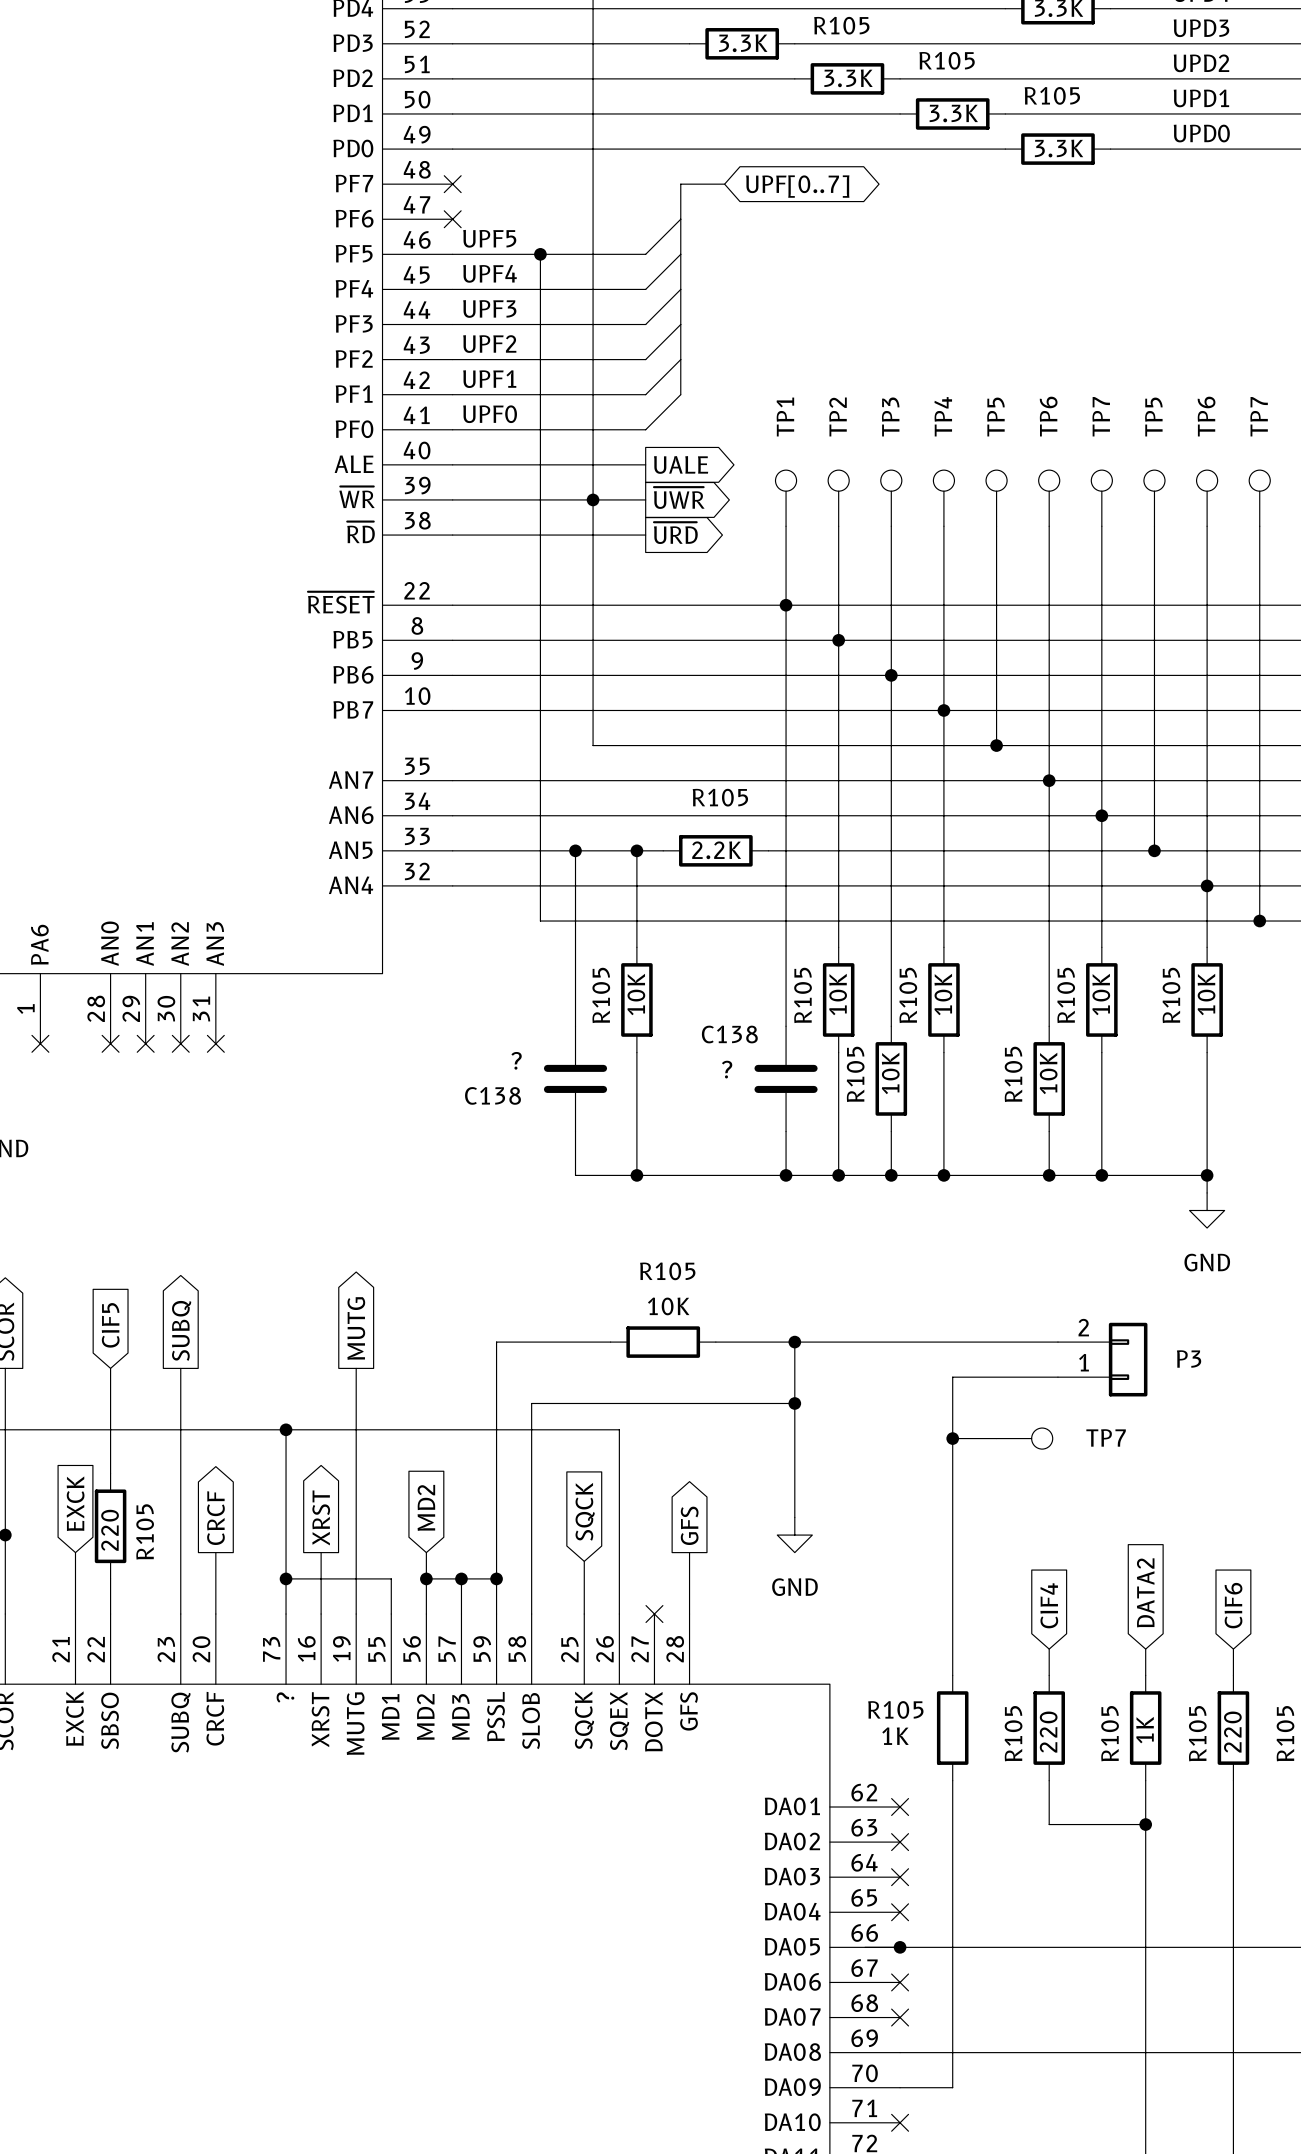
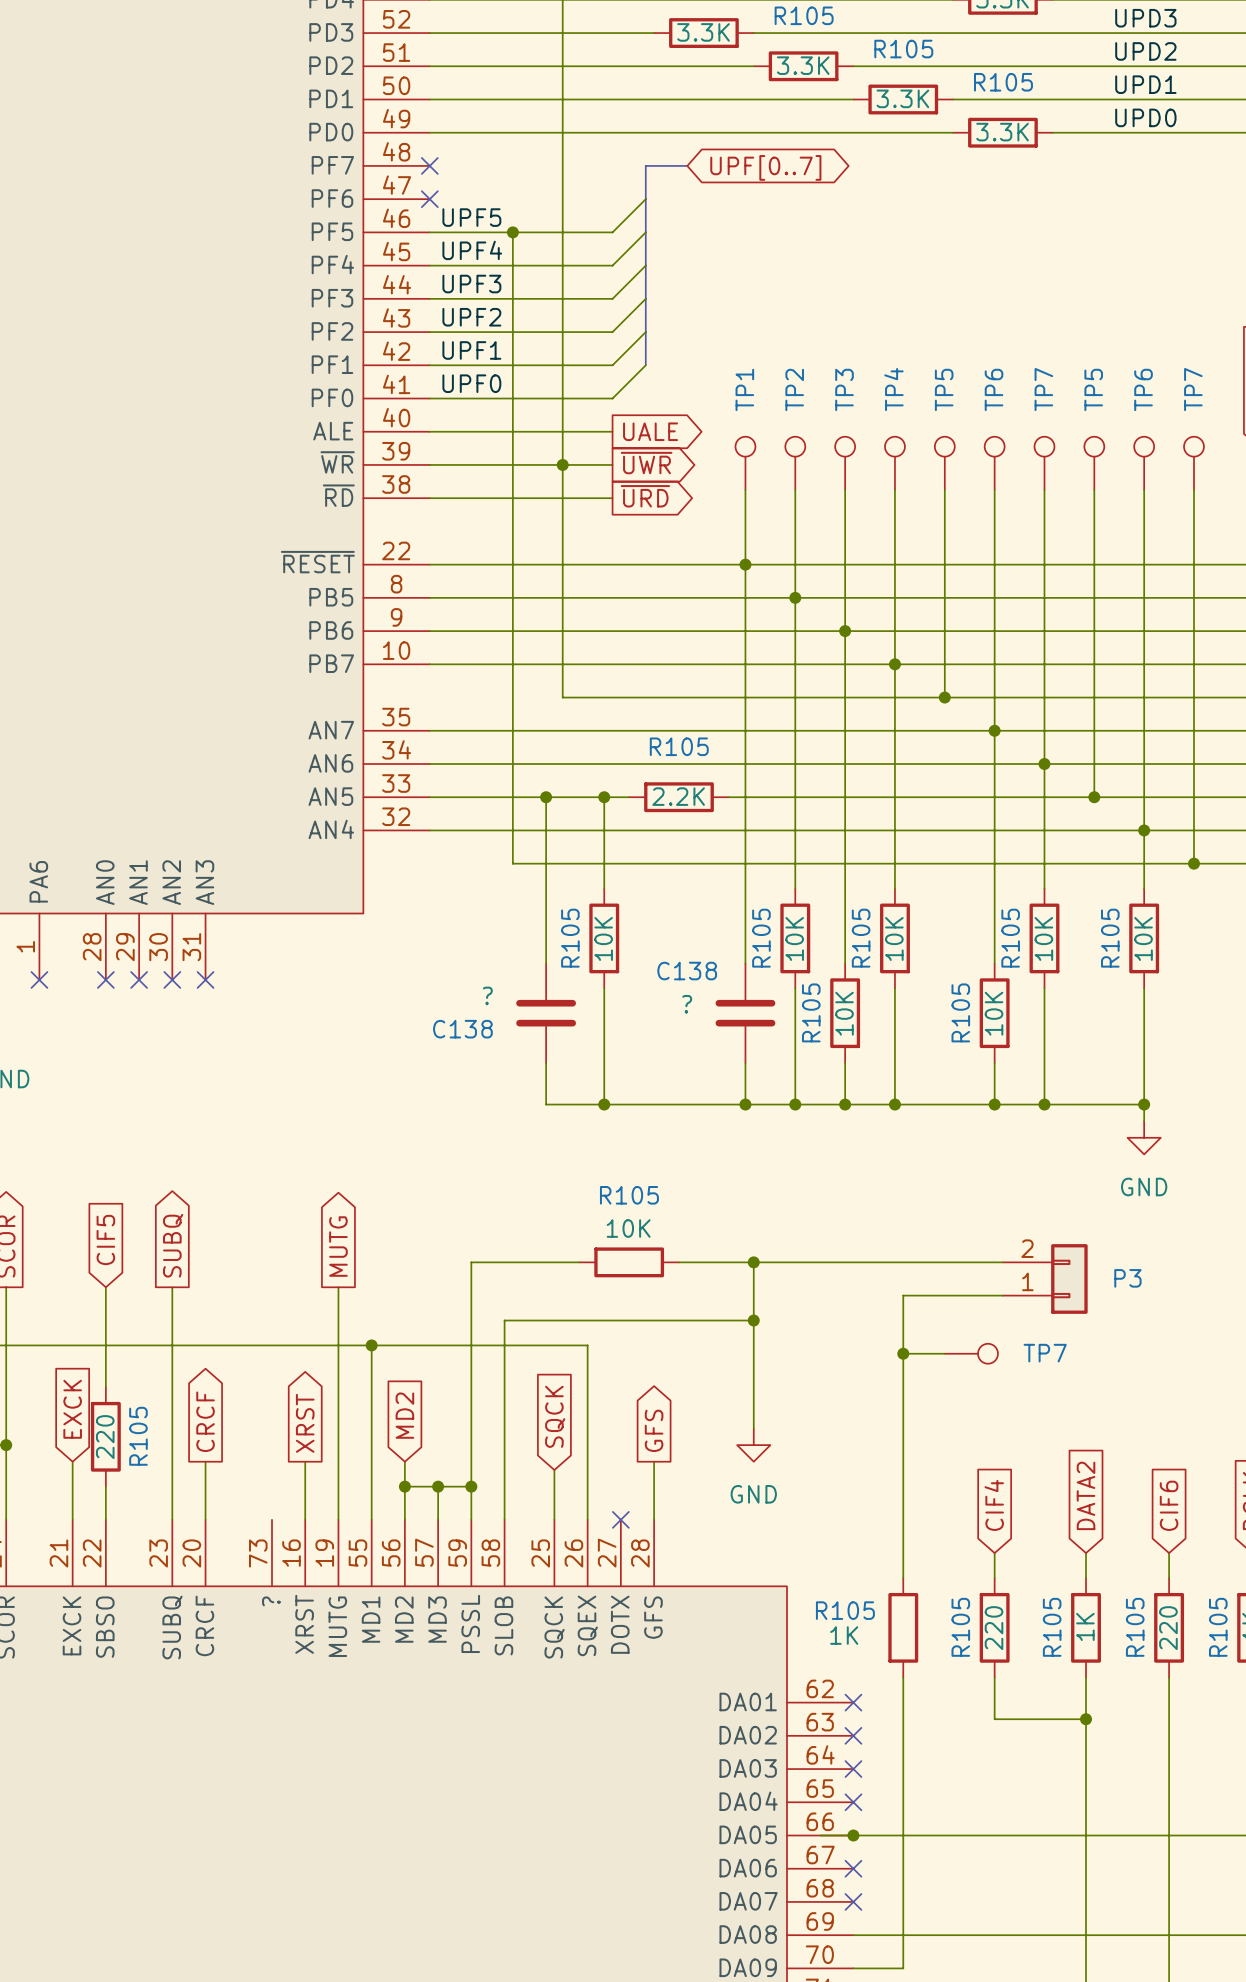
wire: (286, 1429) (286, 1614) -> none
junction: (286, 1429) -> none
junction: none -> (371, 1345)
wire: (286, 1578) (391, 1578) -> (371, 1345) (371, 1486)
junction: (286, 1578) -> none

